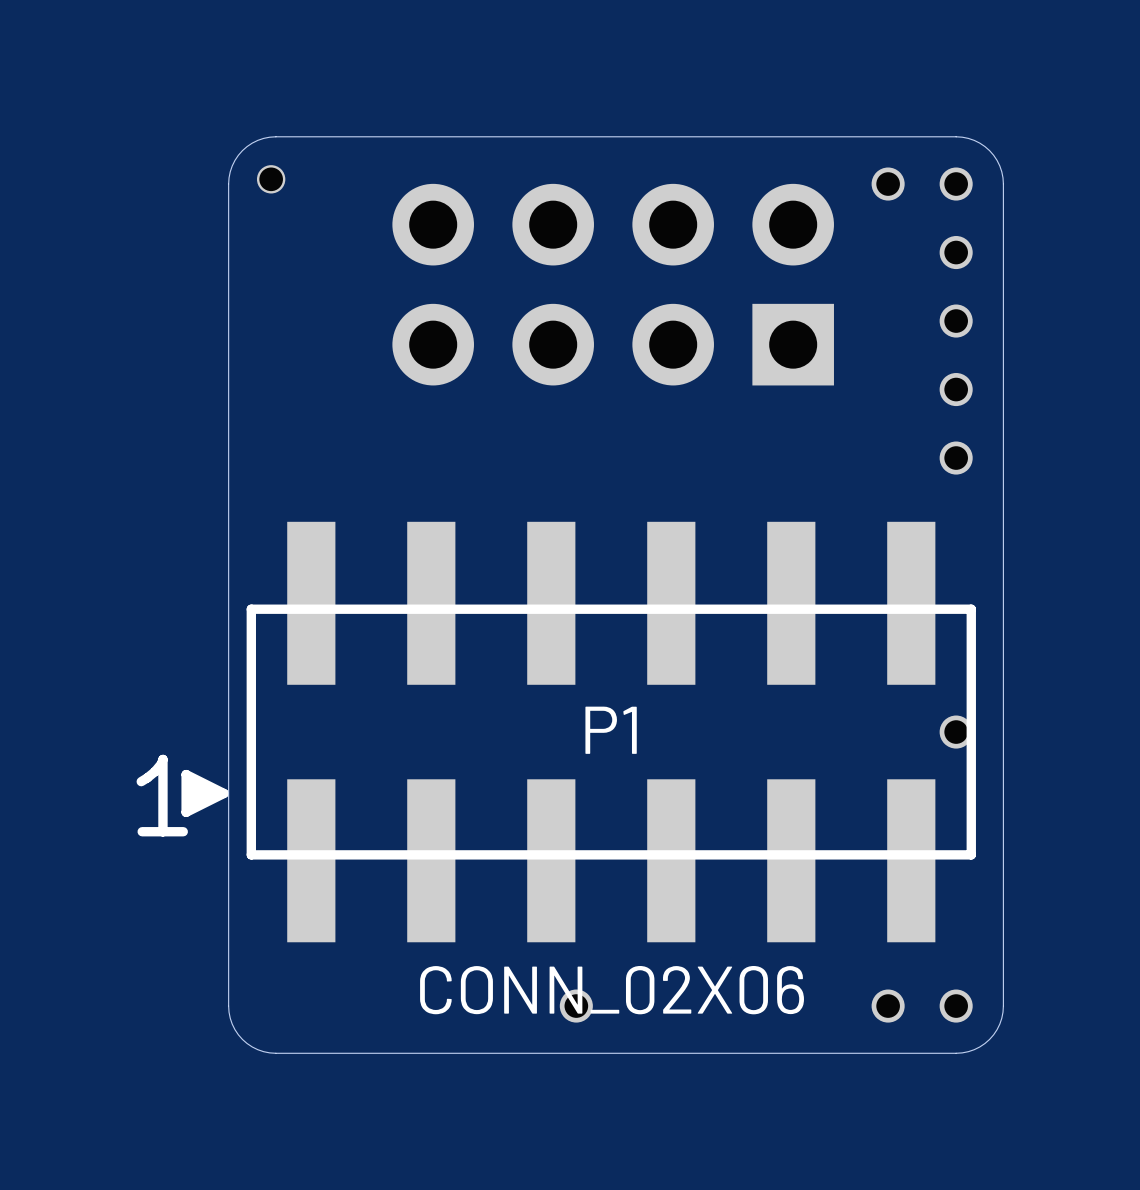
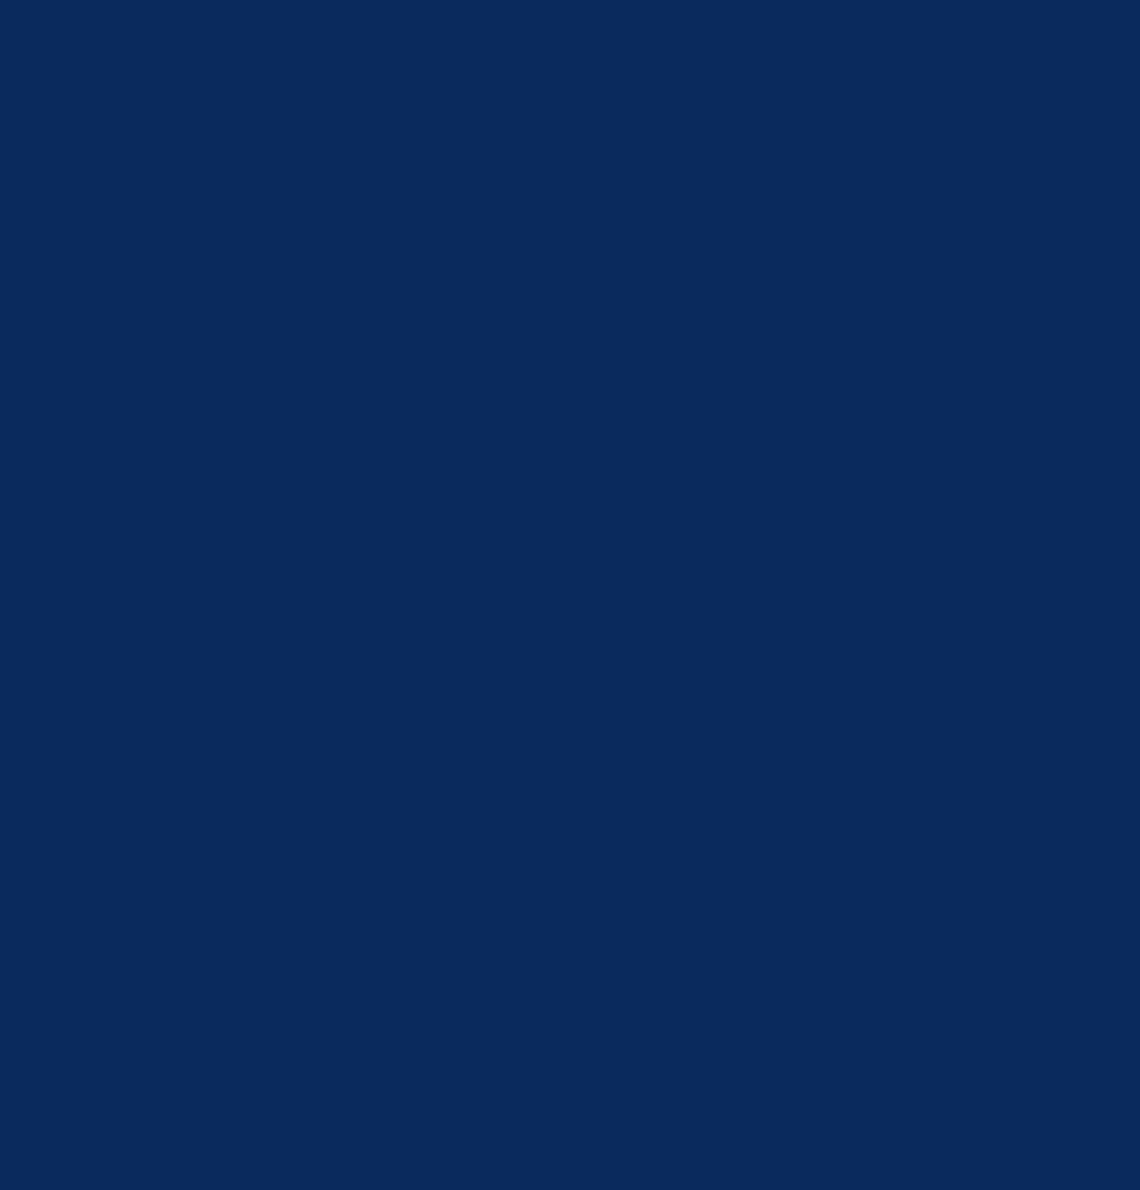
board edge: (956, 136) (275, 136) (257, 140) (247, 146) (238, 155) (230, 171) (228, 184) (228, 1006) (230, 1018) (234, 1029) (247, 1043) (257, 1049) (275, 1053) (956, 1053) (974, 1049) (984, 1043) (993, 1034) (1001, 1018) (1003, 1006) (1003, 184) (999, 165) (989, 150) (974, 140) (956, 136) -> none
part: (271, 179) -> none
part: (888, 184) -> none
part: (956, 184) -> none
part: (956, 252) -> none
part: (613, 284) -> none
part: (956, 321) -> none
part: (956, 389) -> none
part: (956, 458) -> none
P1: CONN_02X06 (556, 732) -> none
part: (956, 732) -> none
part: (576, 1006) -> none
part: (888, 1006) -> none
part: (956, 1006) -> none

